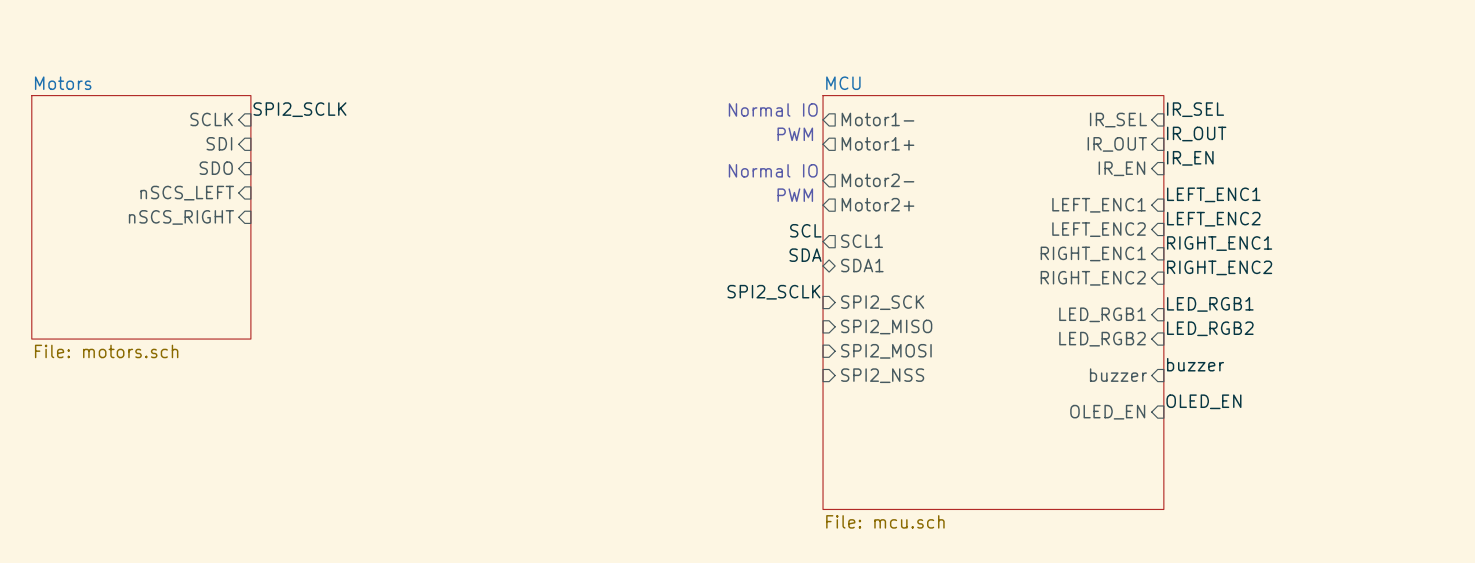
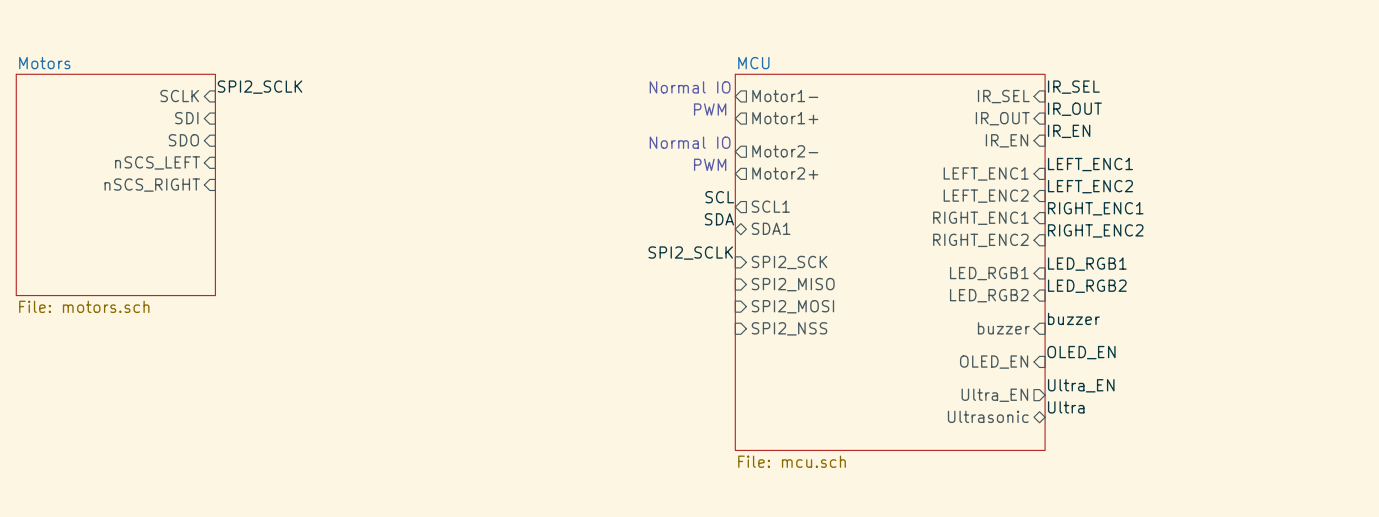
label: none -> Ultra_EN (1081, 385)
sheet pin: none -> Ultra_EN (994, 395)
label: none -> Ultra (1066, 407)
sheet pin: none -> Ultrasonic (988, 416)

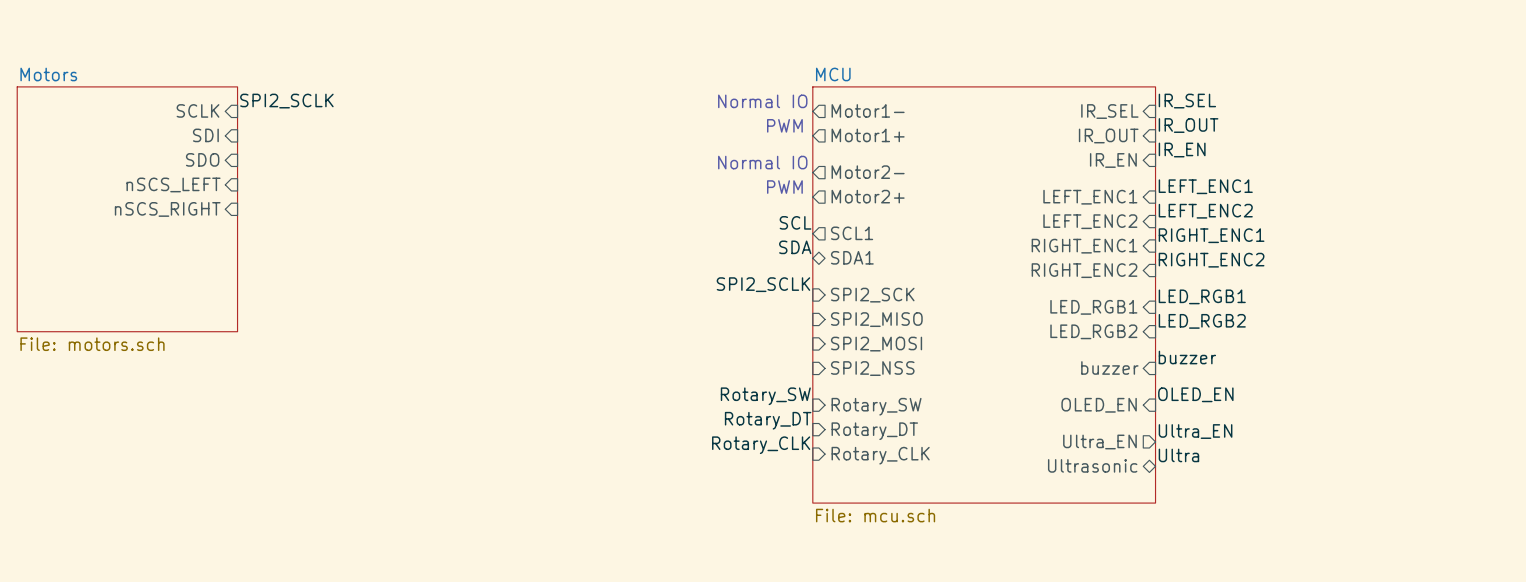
label: none -> Rotary_SW (765, 396)
sheet pin: none -> Rotary_SW (876, 406)
label: none -> Rotary_DT (768, 420)
sheet pin: none -> Rotary_DT (874, 431)
label: none -> Rotary_CLK (761, 445)
sheet pin: none -> Rotary_CLK (880, 455)

